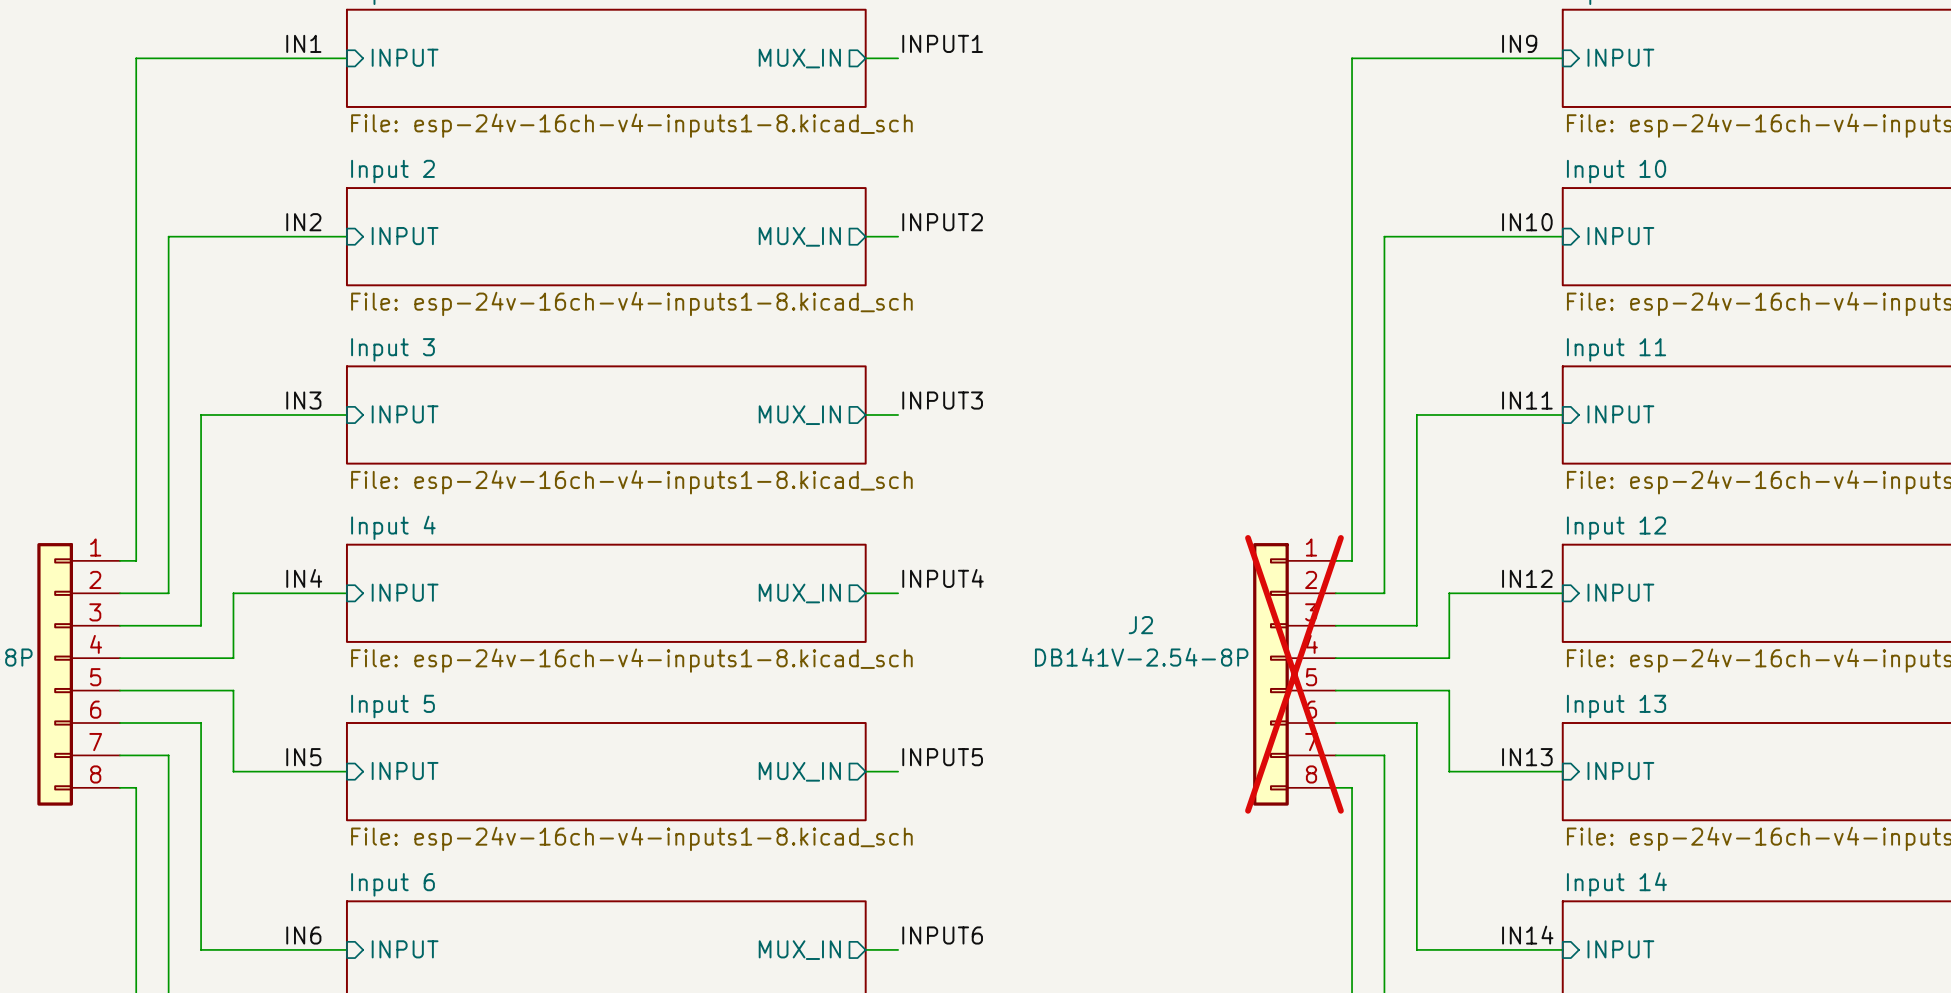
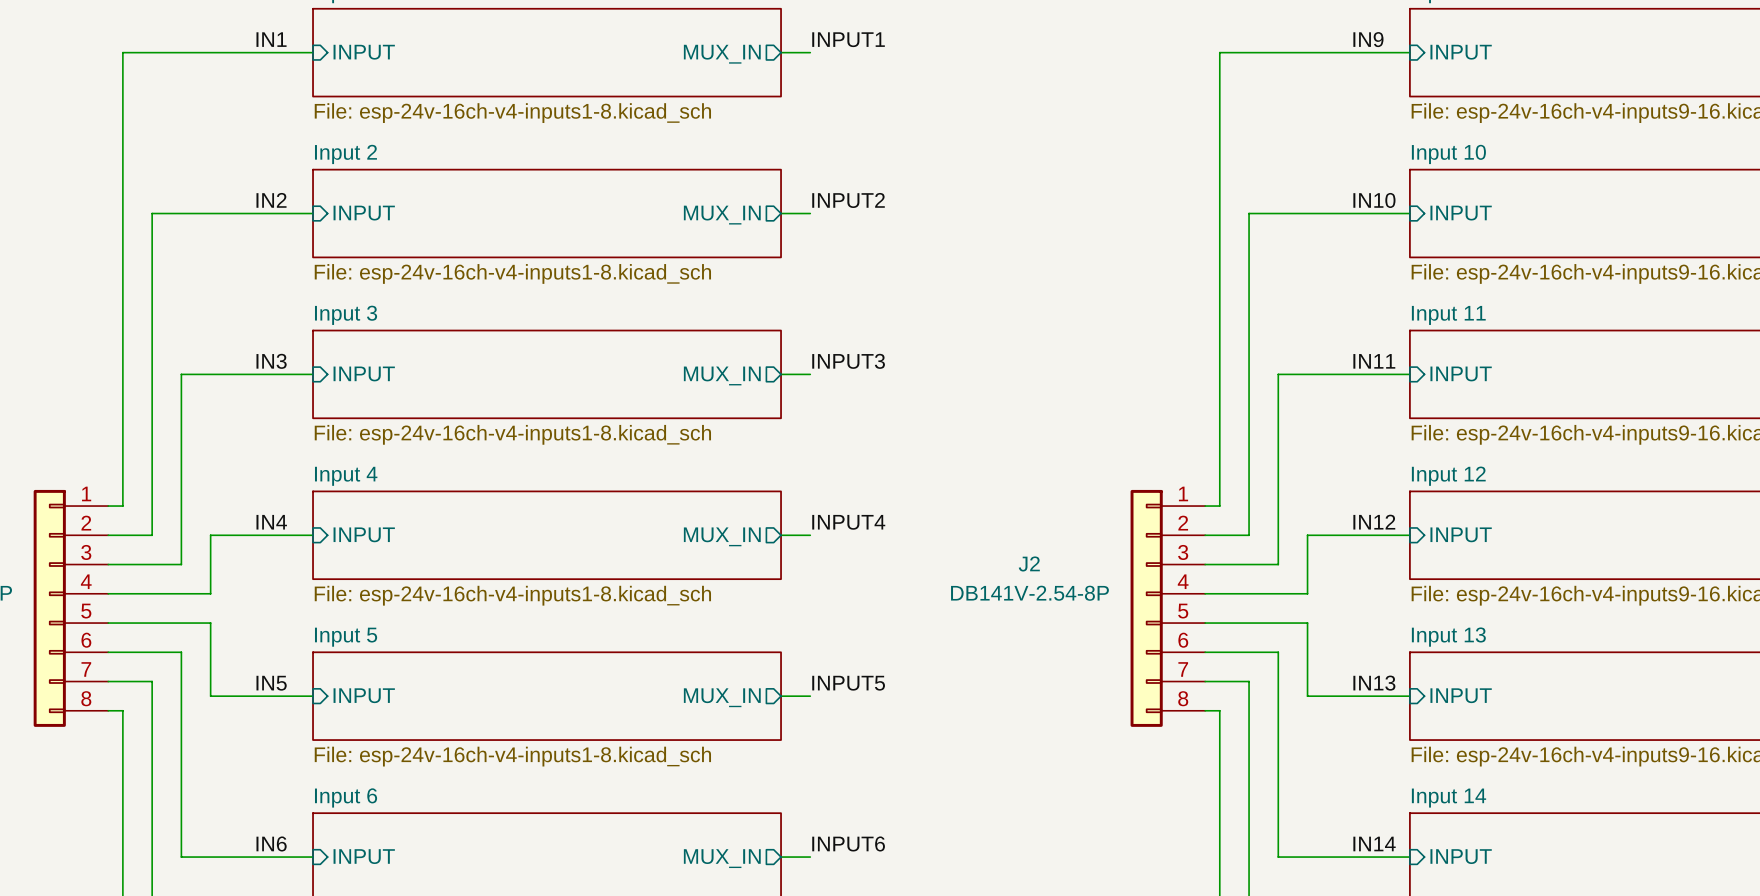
J2 do-not-place cross: (1294, 674) -> none

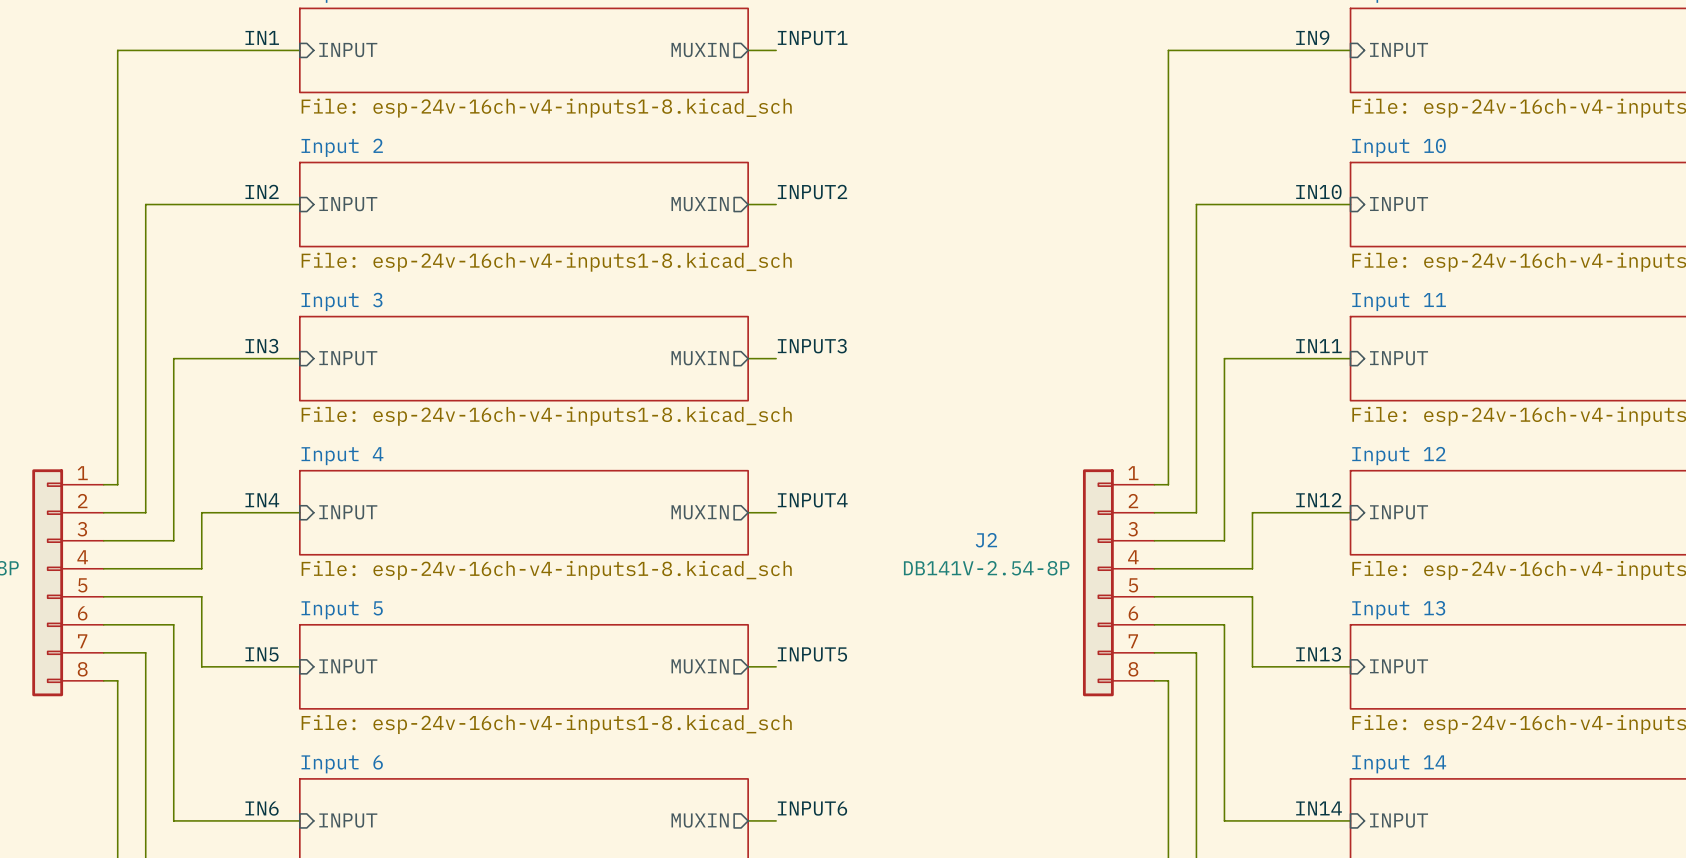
sheet pin: MUX_IN (722, 54) -> MUXIN (700, 50)
sheet pin: MUX_IN (722, 215) -> MUXIN (700, 204)
sheet pin: MUX_IN (722, 375) -> MUXIN (700, 358)
sheet pin: MUX_IN (722, 536) -> MUXIN (700, 512)
sheet pin: MUX_IN (722, 697) -> MUXIN (700, 666)
sheet pin: MUX_IN (722, 858) -> MUXIN (700, 820)

